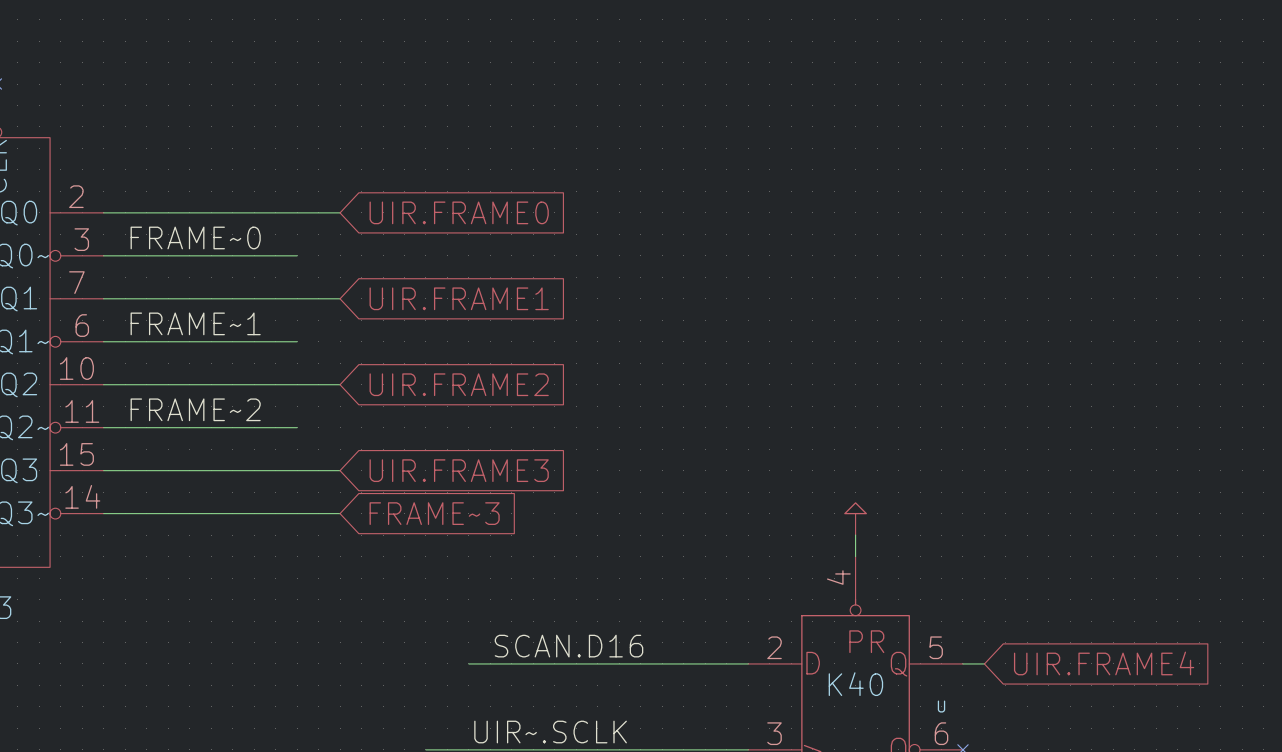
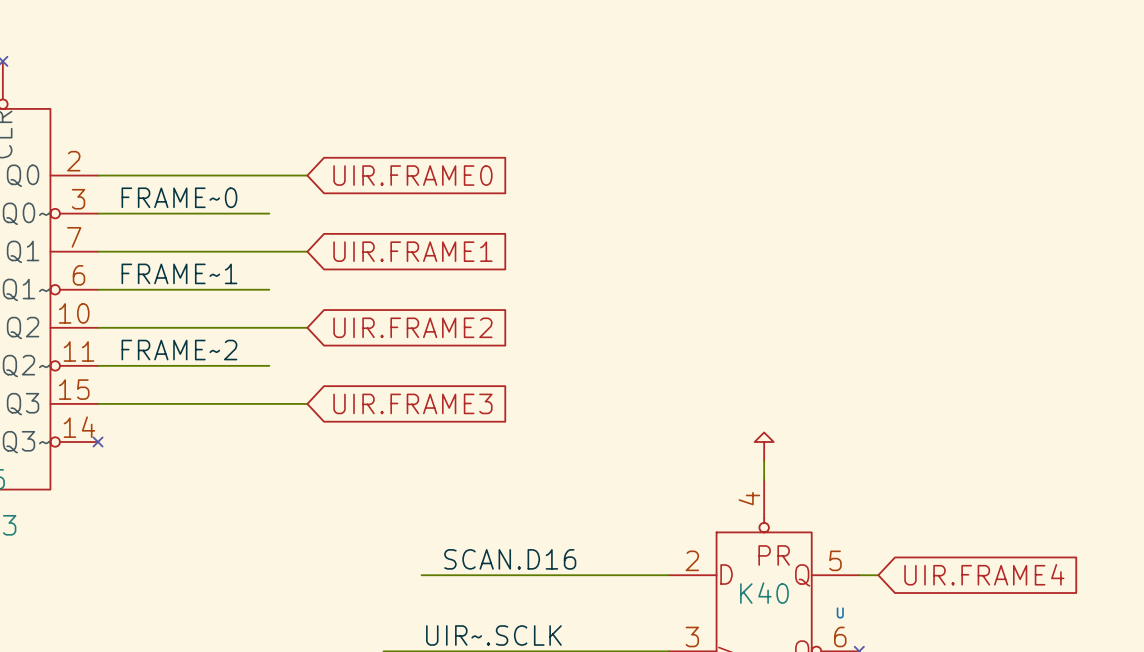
wire: (103, 513) (340, 513) -> none
no-connect mark: none -> (98, 442)
global label: FRAME~3 (434, 513) -> none

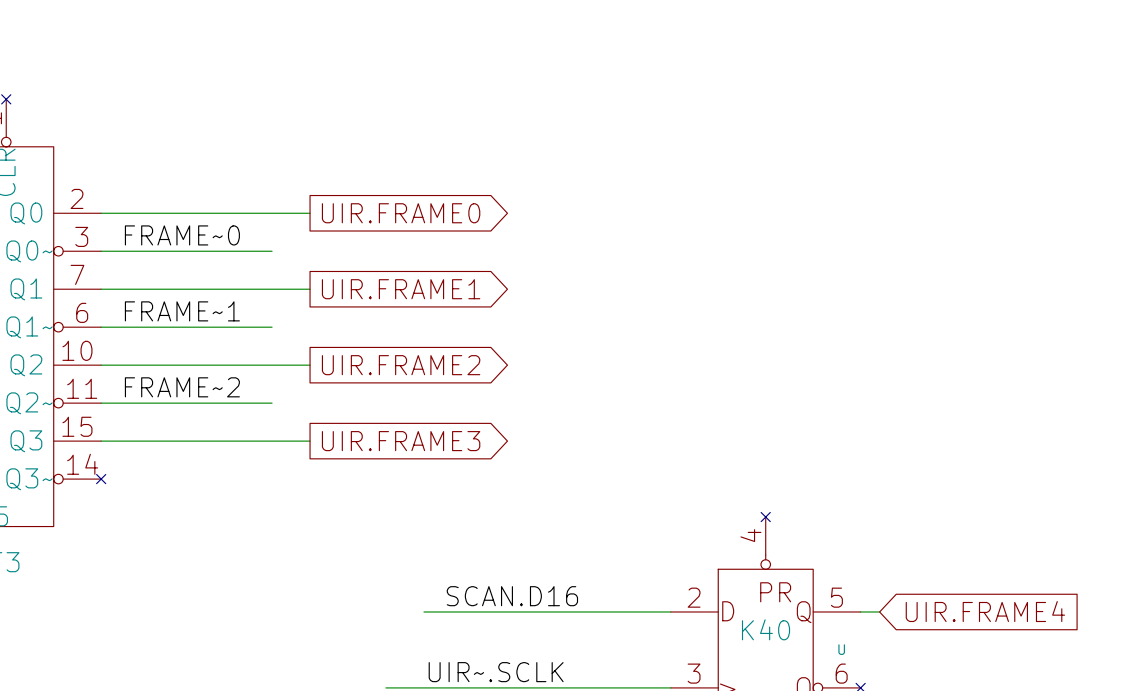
global label shape: input (412, 175) -> output (401, 213)
global label shape: input (412, 251) -> output (401, 289)
global label shape: input (412, 327) -> output (401, 365)
global label shape: input (412, 403) -> output (401, 441)
power symbol: (764, 446) -> none
wire: (764, 461) (764, 480) -> none
no-connect mark: none -> (765, 517)

